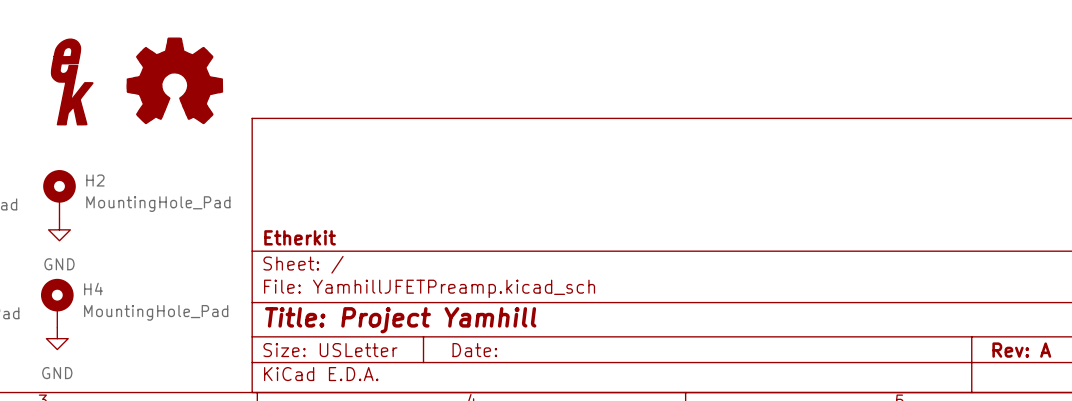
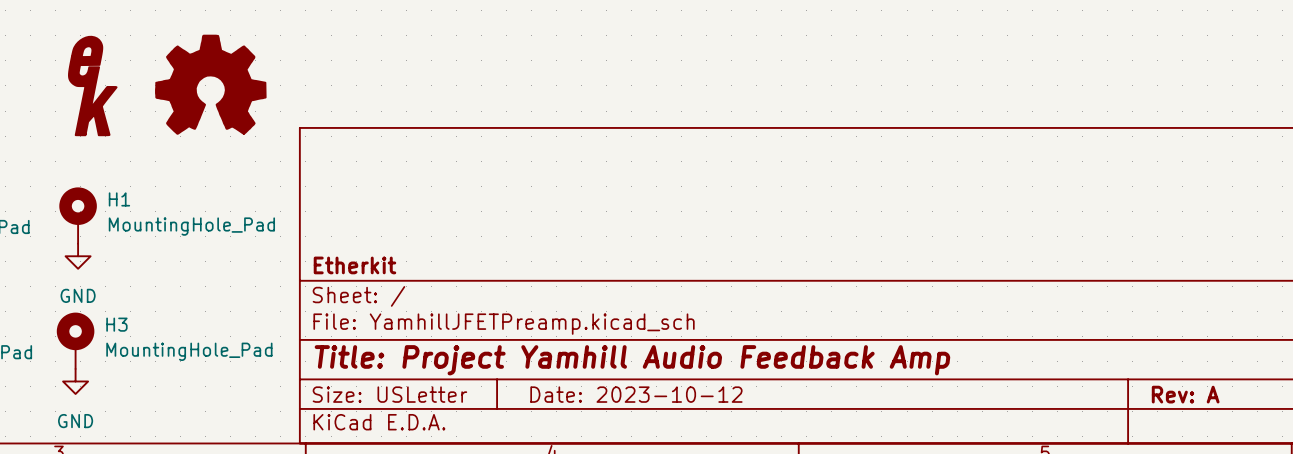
H2 name: H2 (95, 180) -> H1 (119, 199)
H4 name: H4 (93, 289) -> H3 (116, 324)
title block: Title: Project Yamhill (400, 320) -> Title: Project Yamhill Audio Feedback Amp (632, 360)
title block: Date: (474, 350) -> Date: 2023-10-12 (636, 394)

